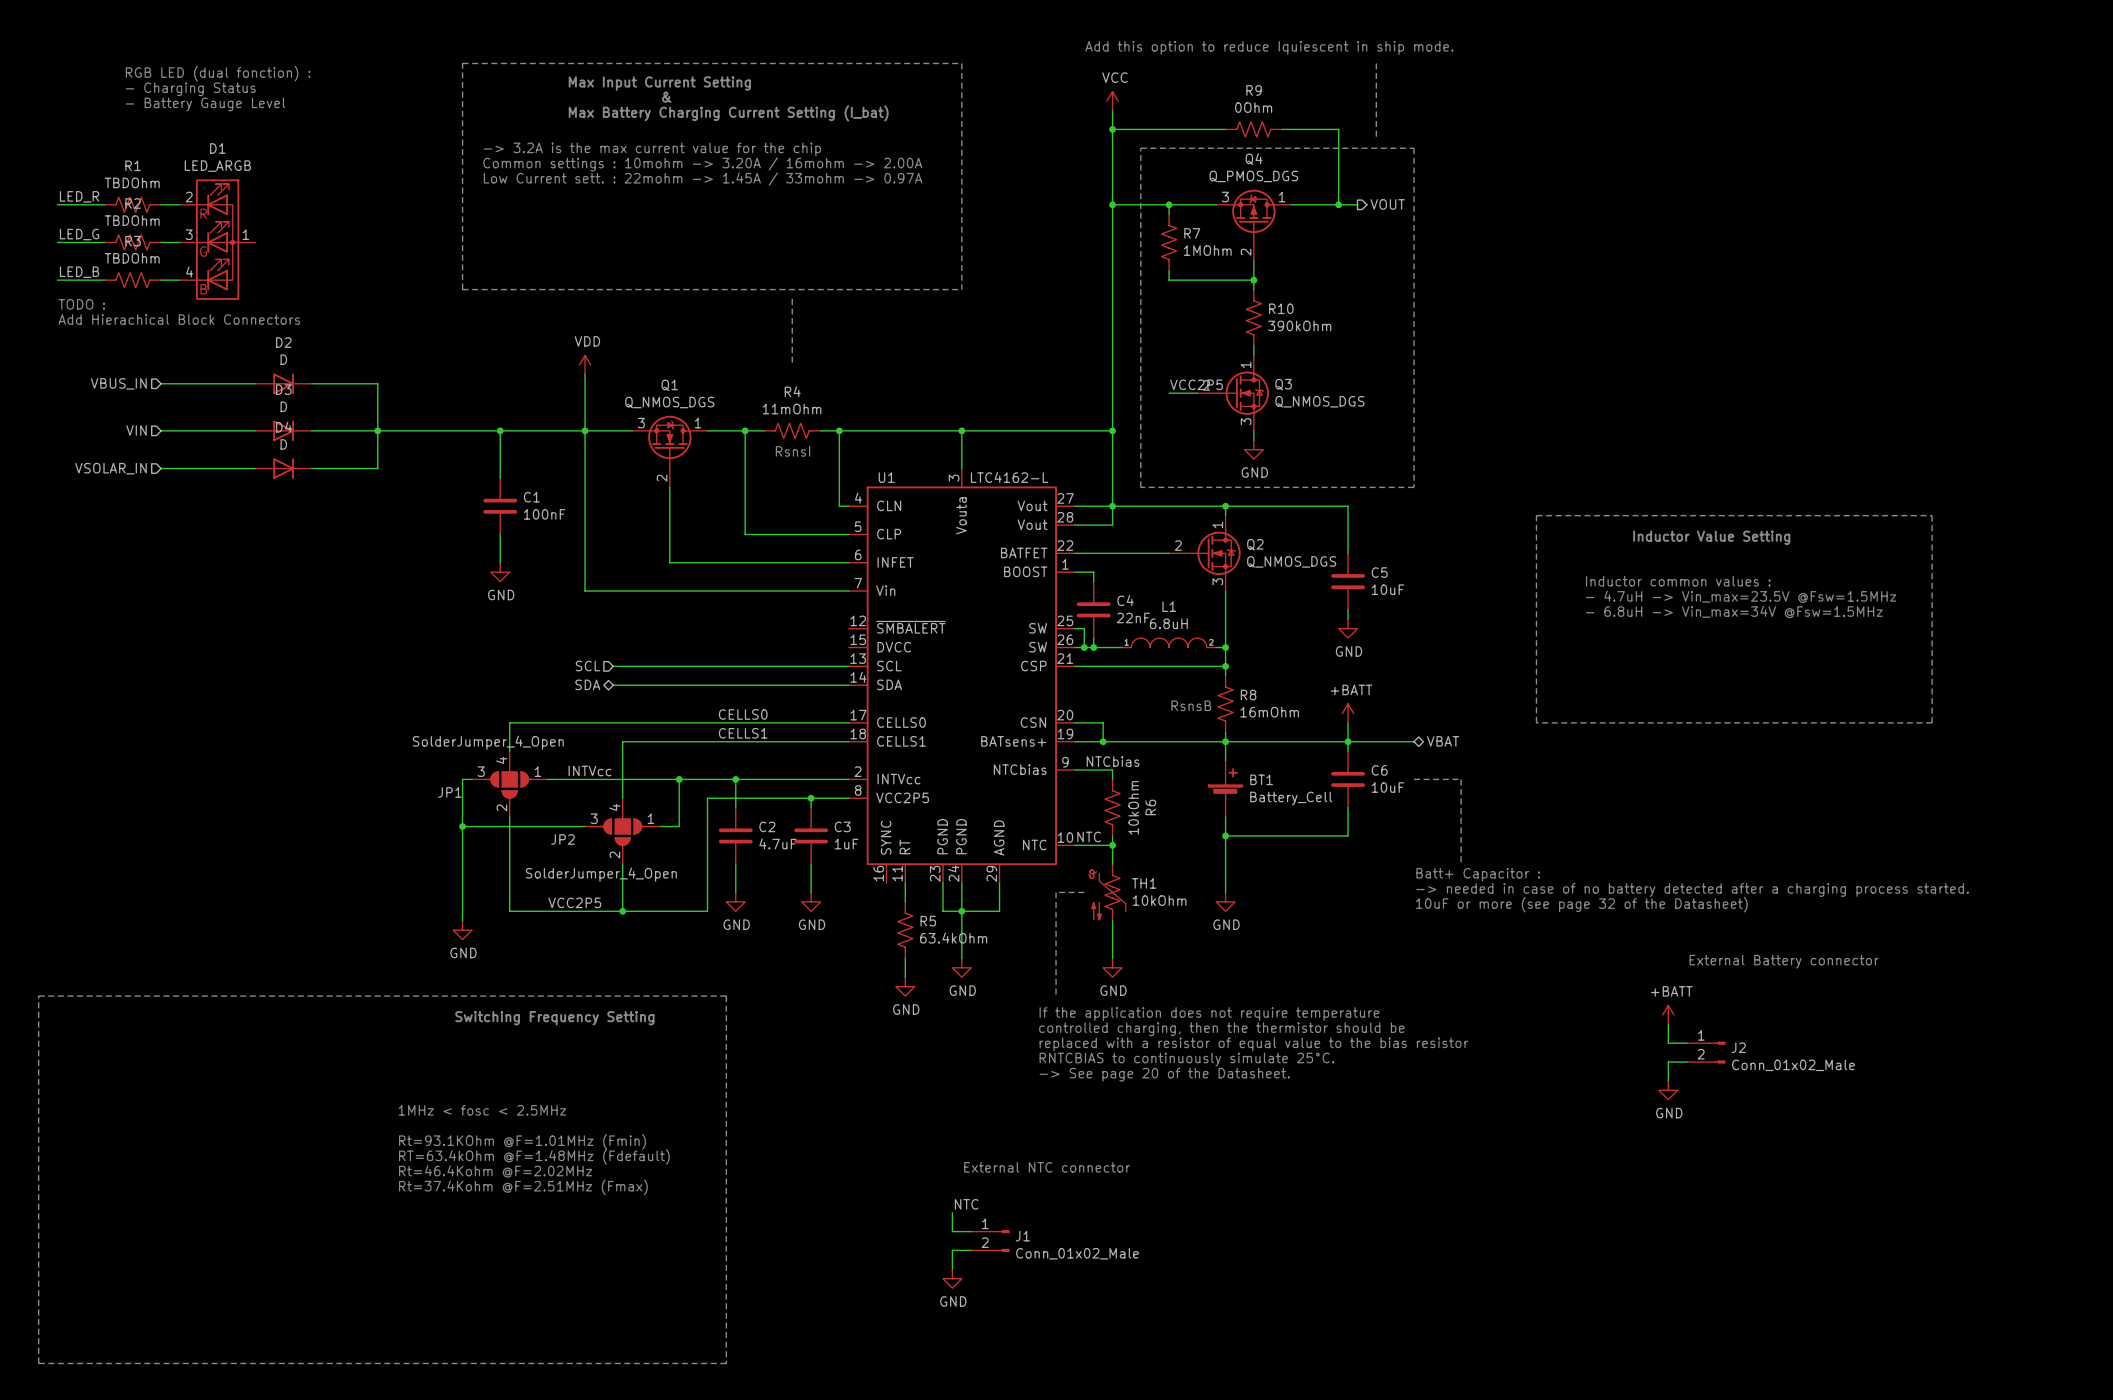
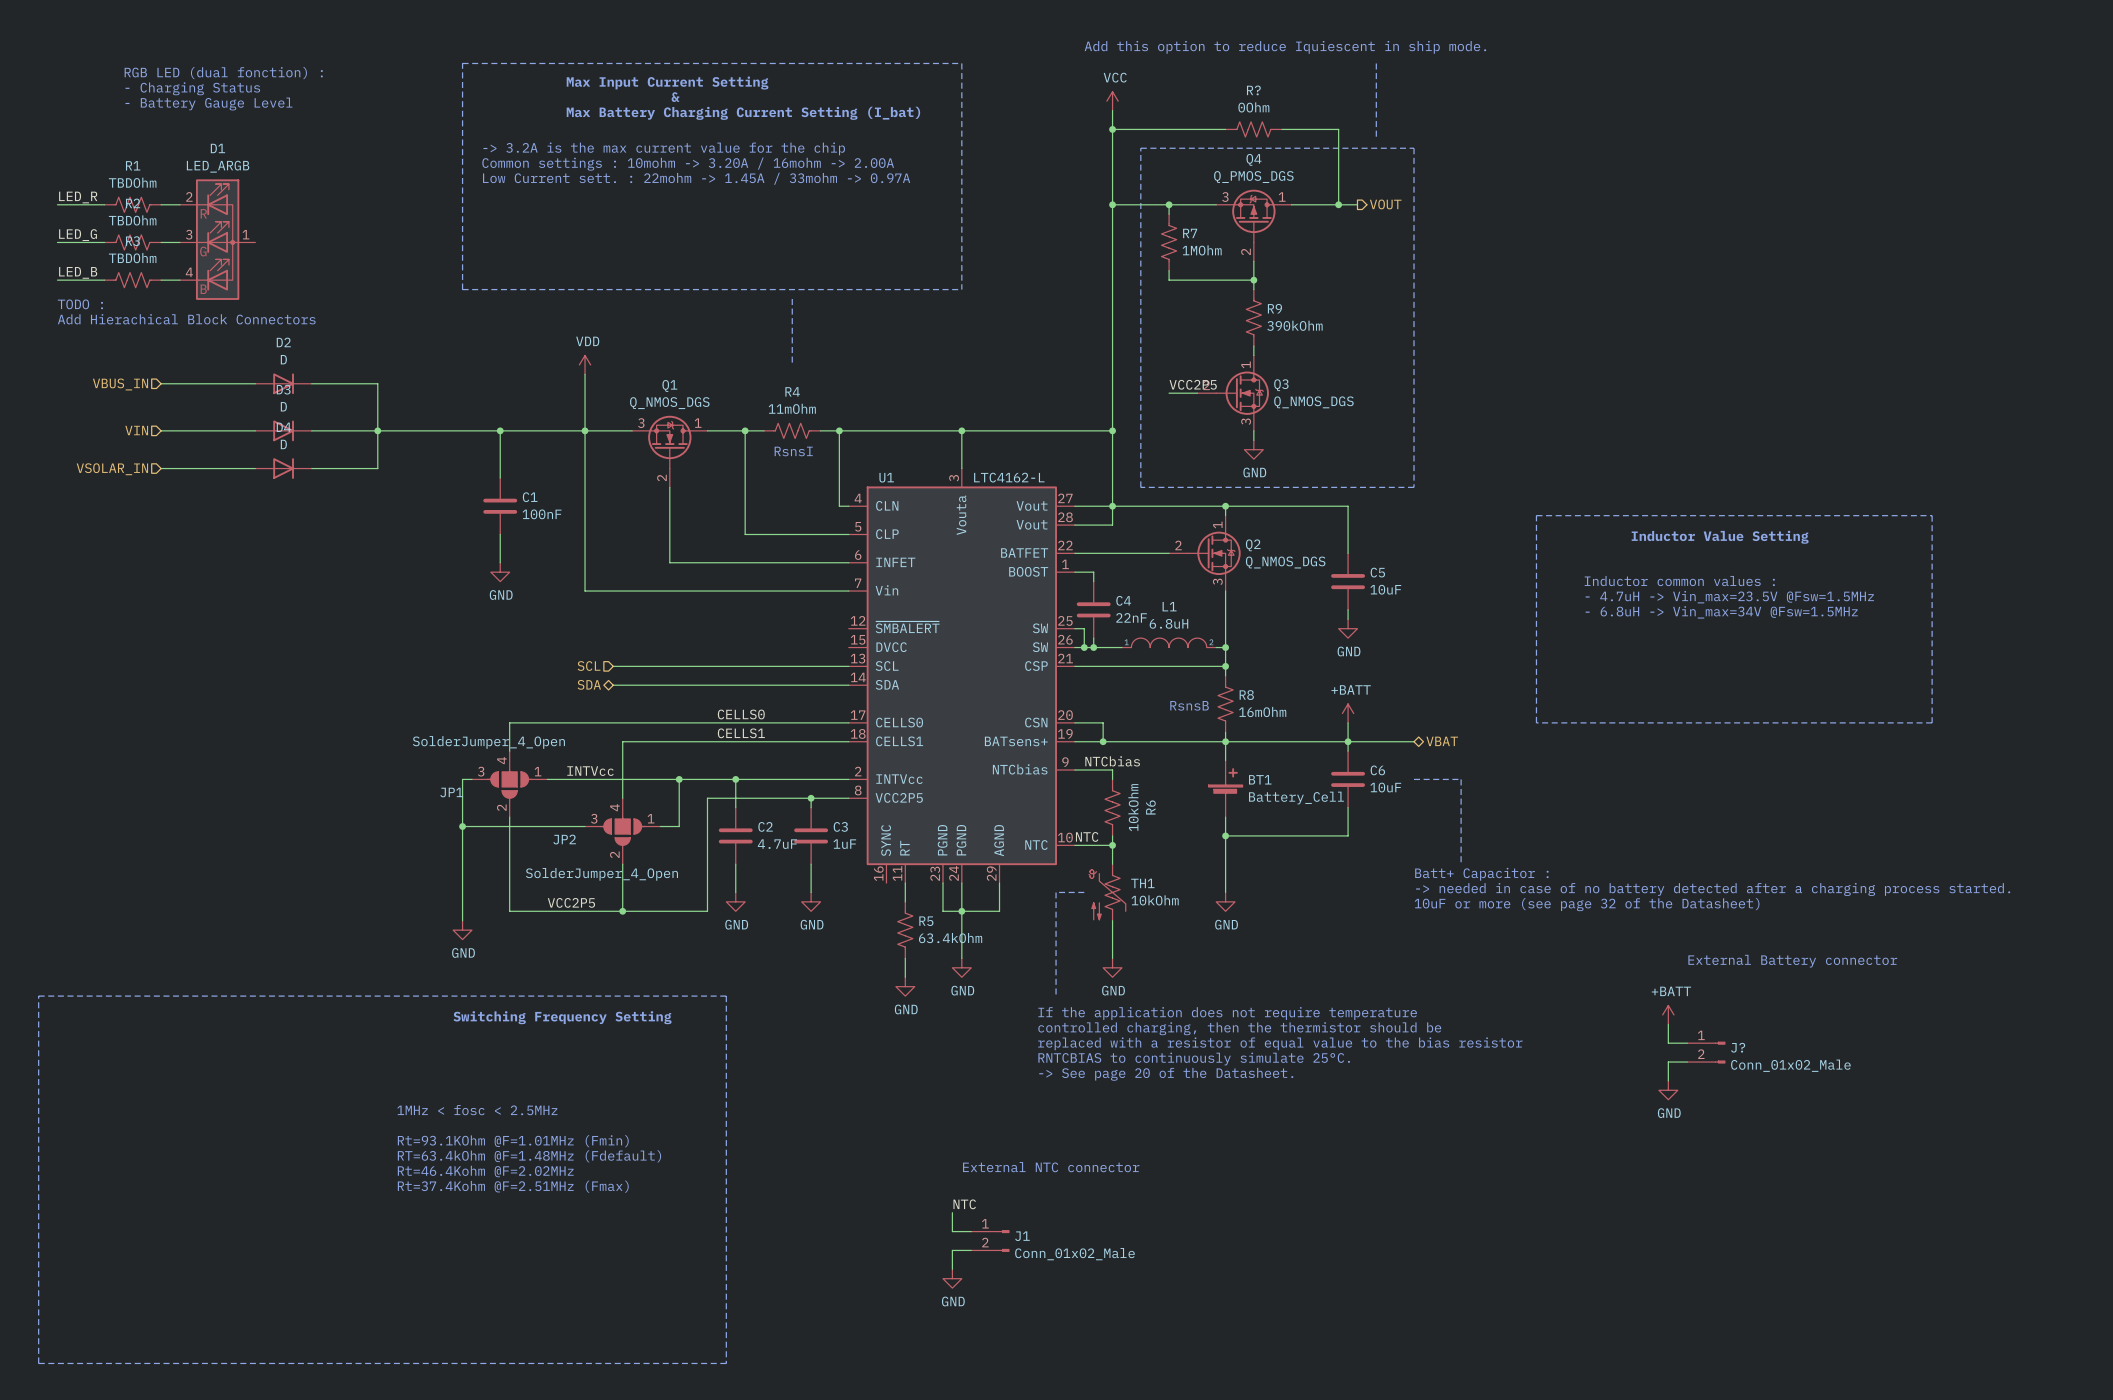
R9 name: R9 (1254, 90) -> R? (1253, 90)
R10 name: R10 (1281, 308) -> R9 (1274, 308)
J2 name: J2 (1738, 1047) -> J? (1738, 1047)

